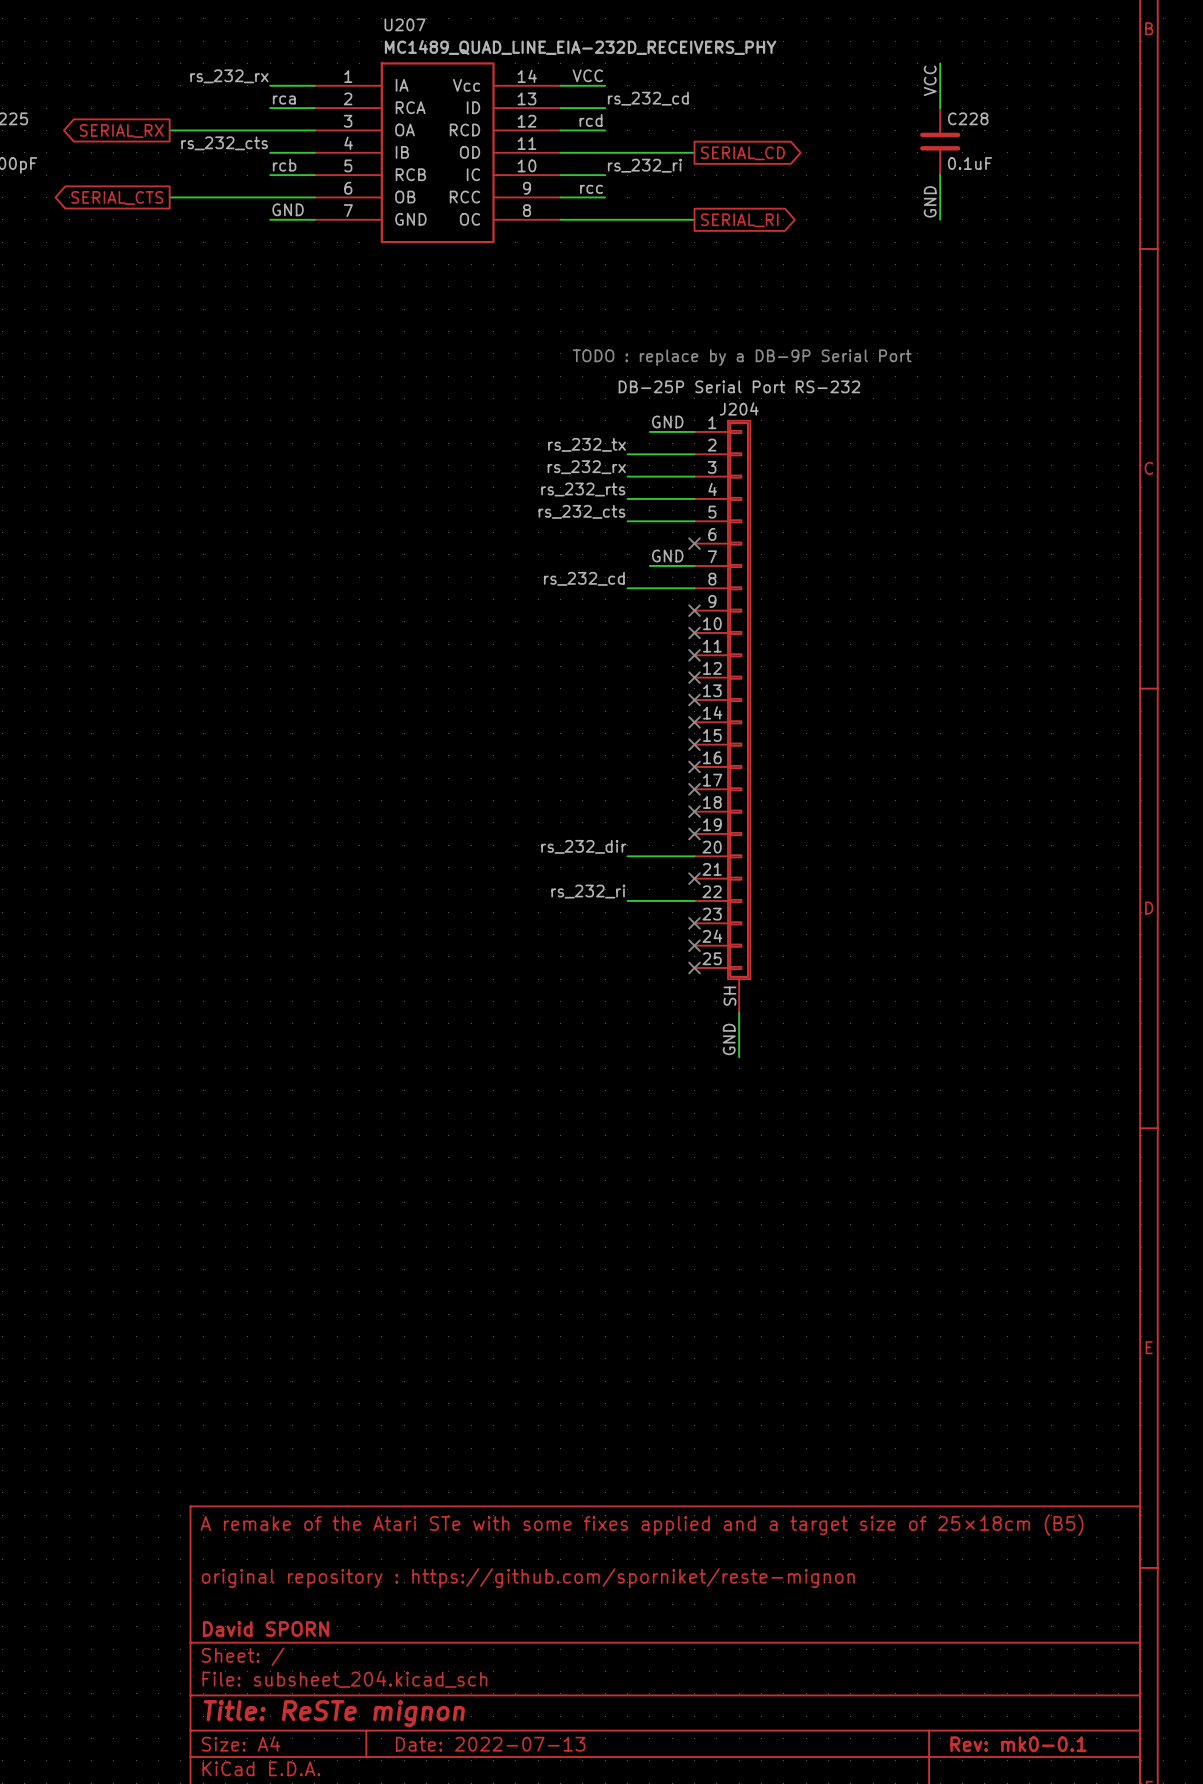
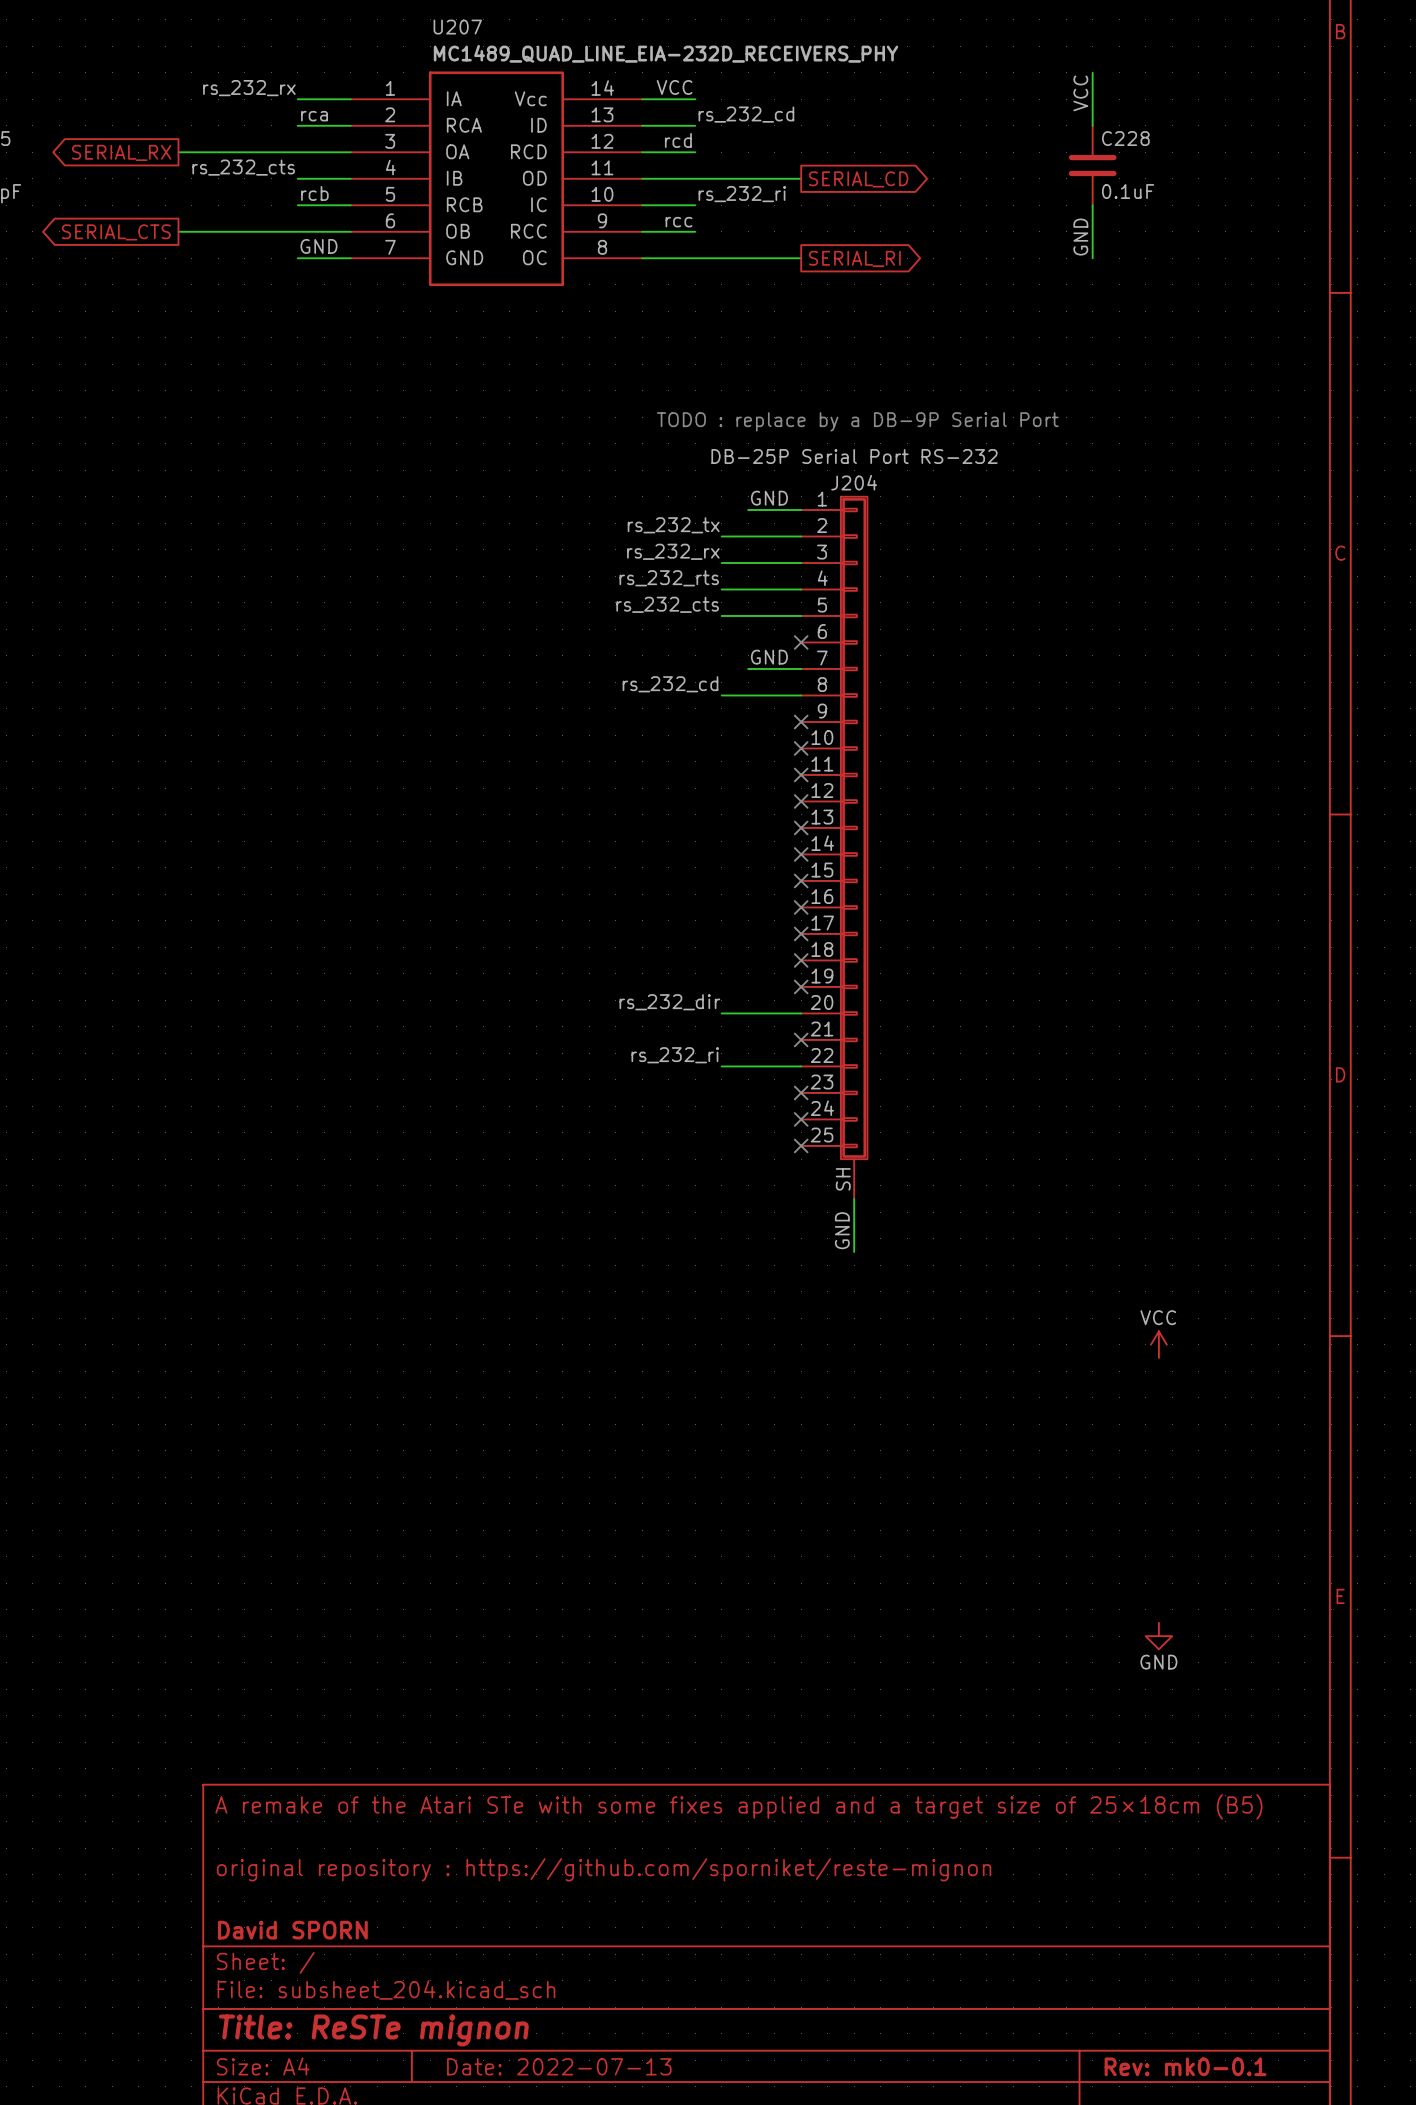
power symbol: none -> VCC (1158, 1344)
power symbol: none -> GND (1158, 1636)

